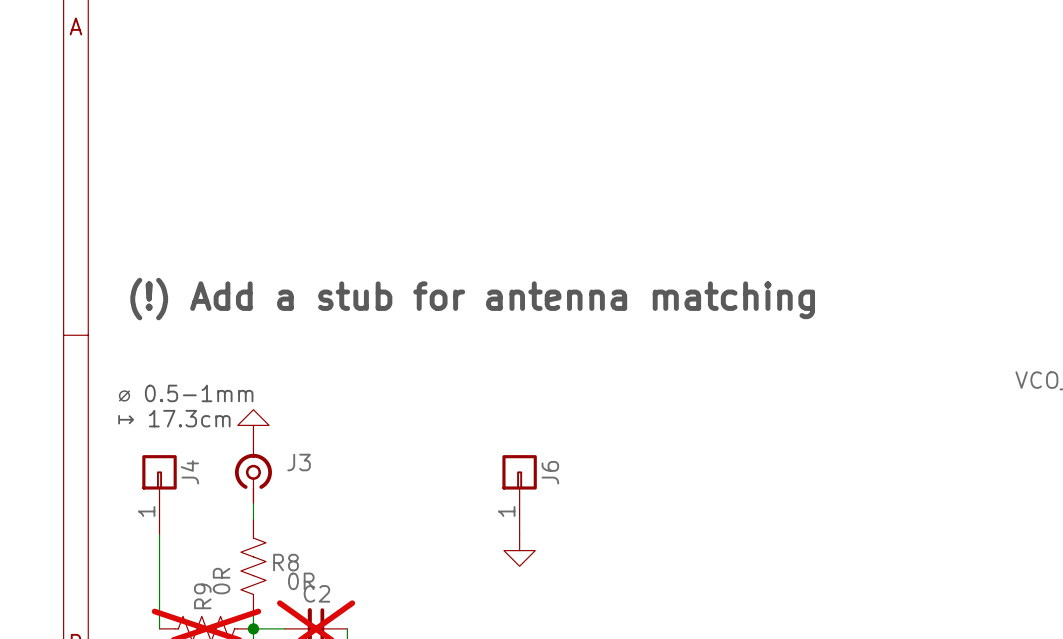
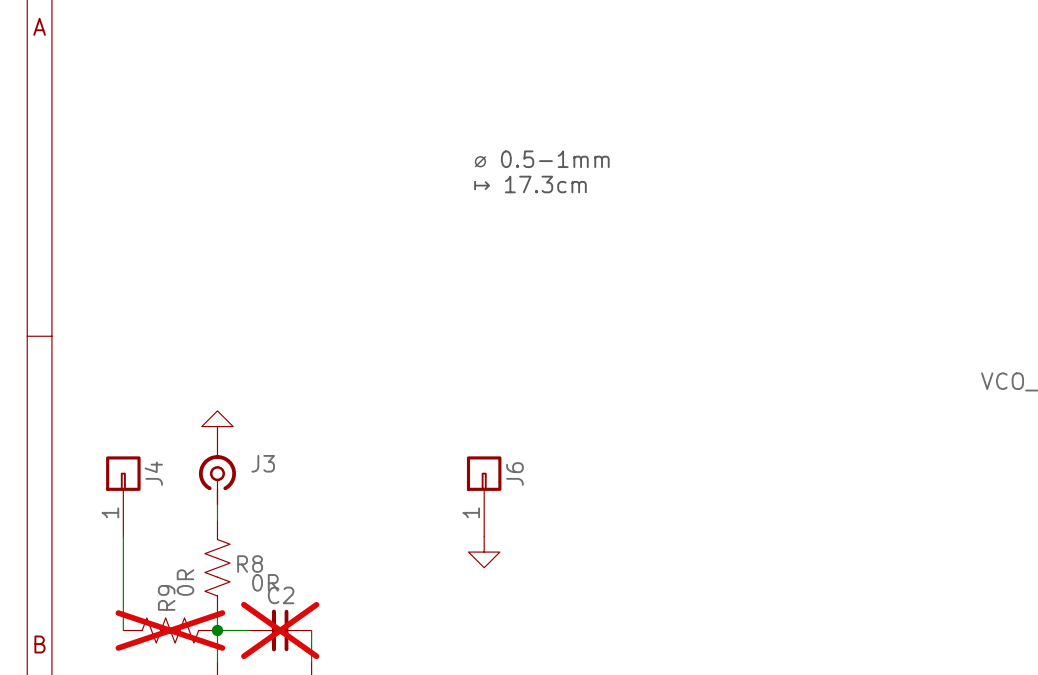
text: none -> ⌀ 0.5-1mm (541, 159)
text: none -> ↦ 17.3cm (530, 184)
text: (!) Add a stub for antenna matching (472, 299) -> none
text: ⌀ 0.5-1mm (185, 393) -> none
text: ↦ 17.3cm (173, 418) -> none

